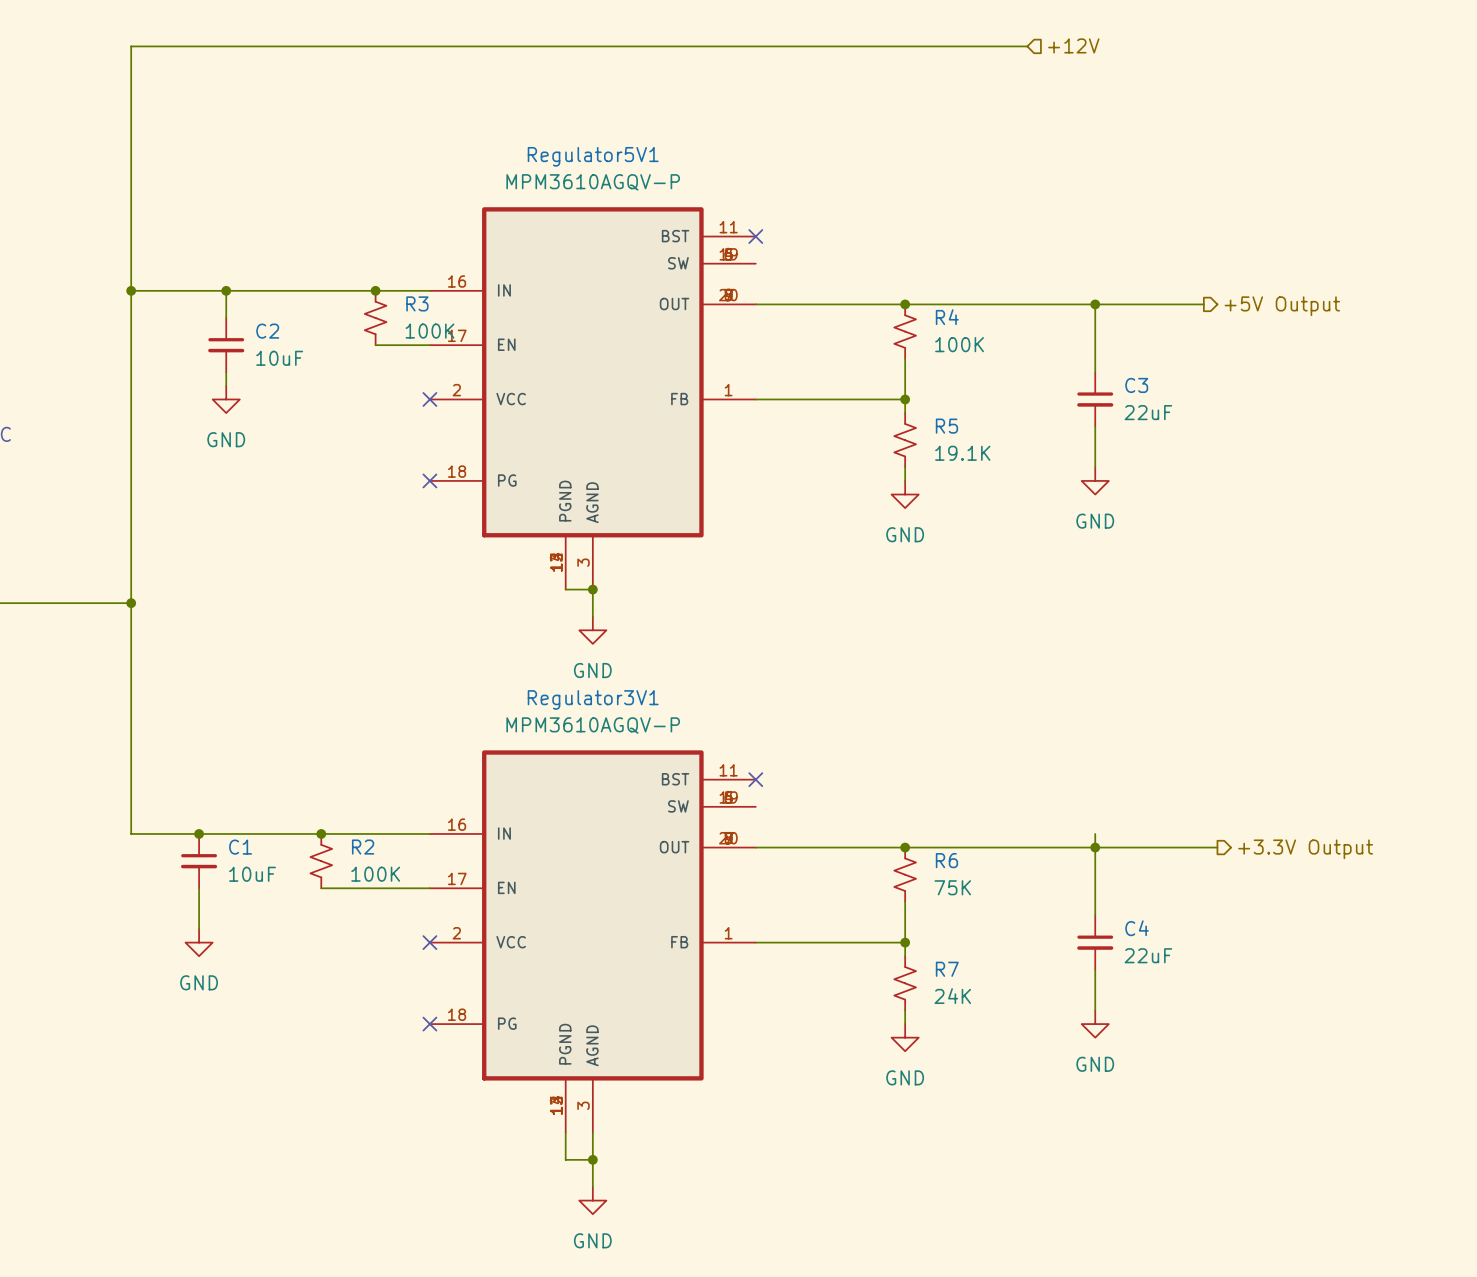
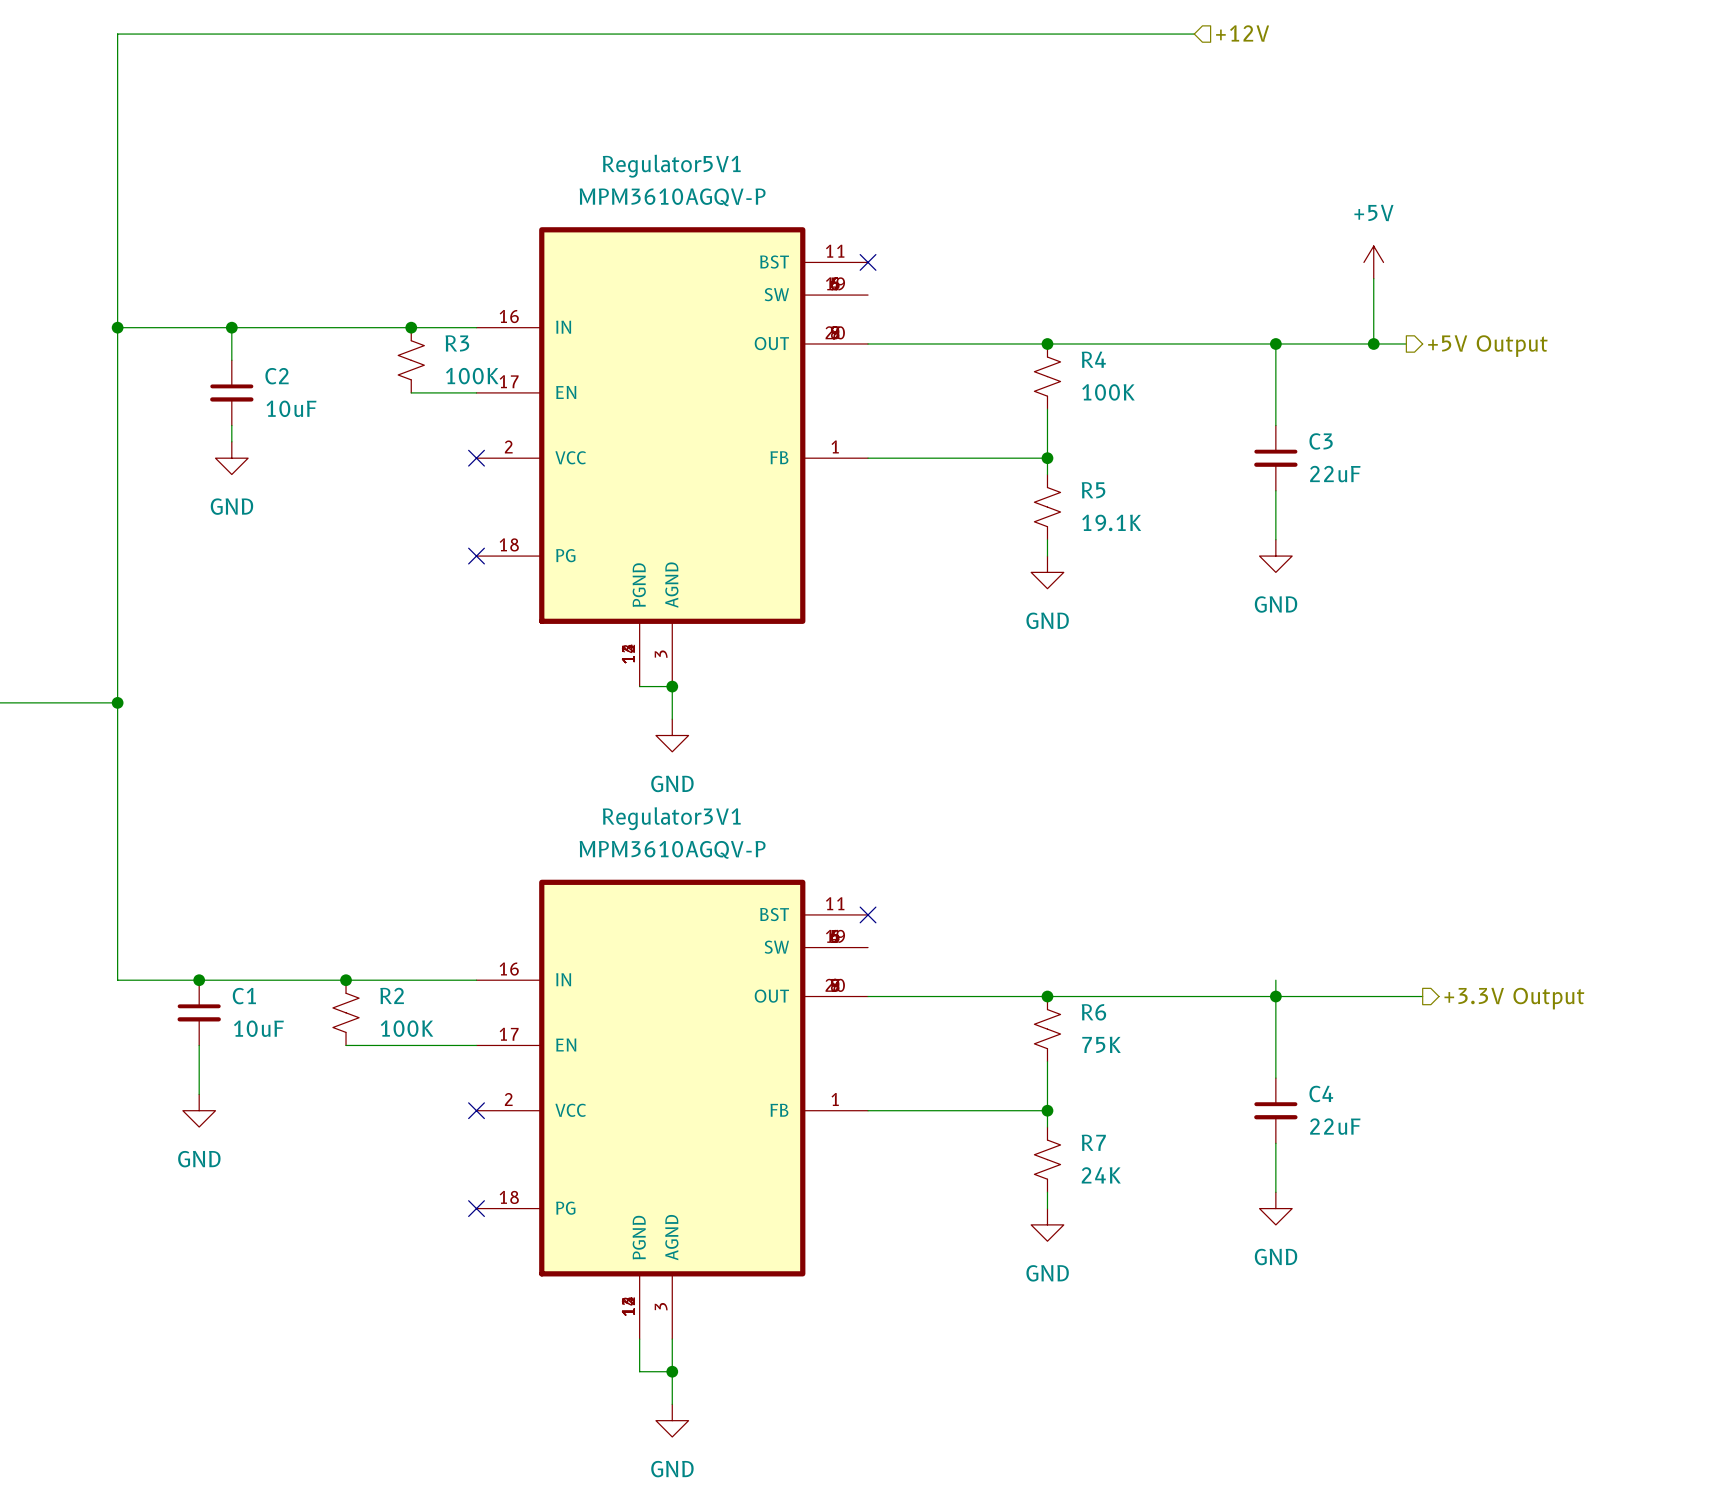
power symbol: none -> +5V (1373, 262)
wire: none -> (1373, 278) (1373, 343)
junction: none -> (1373, 343)

